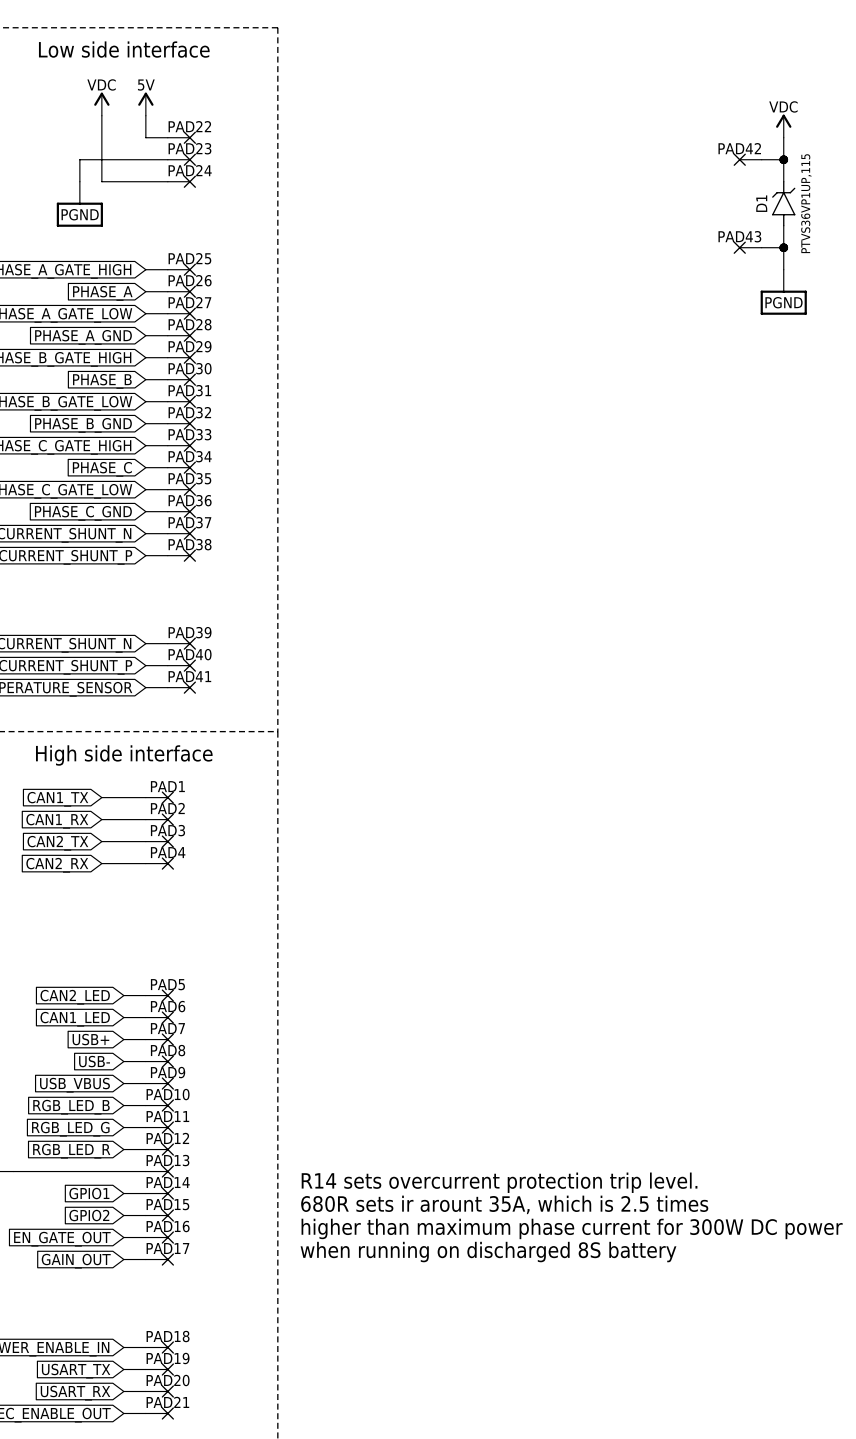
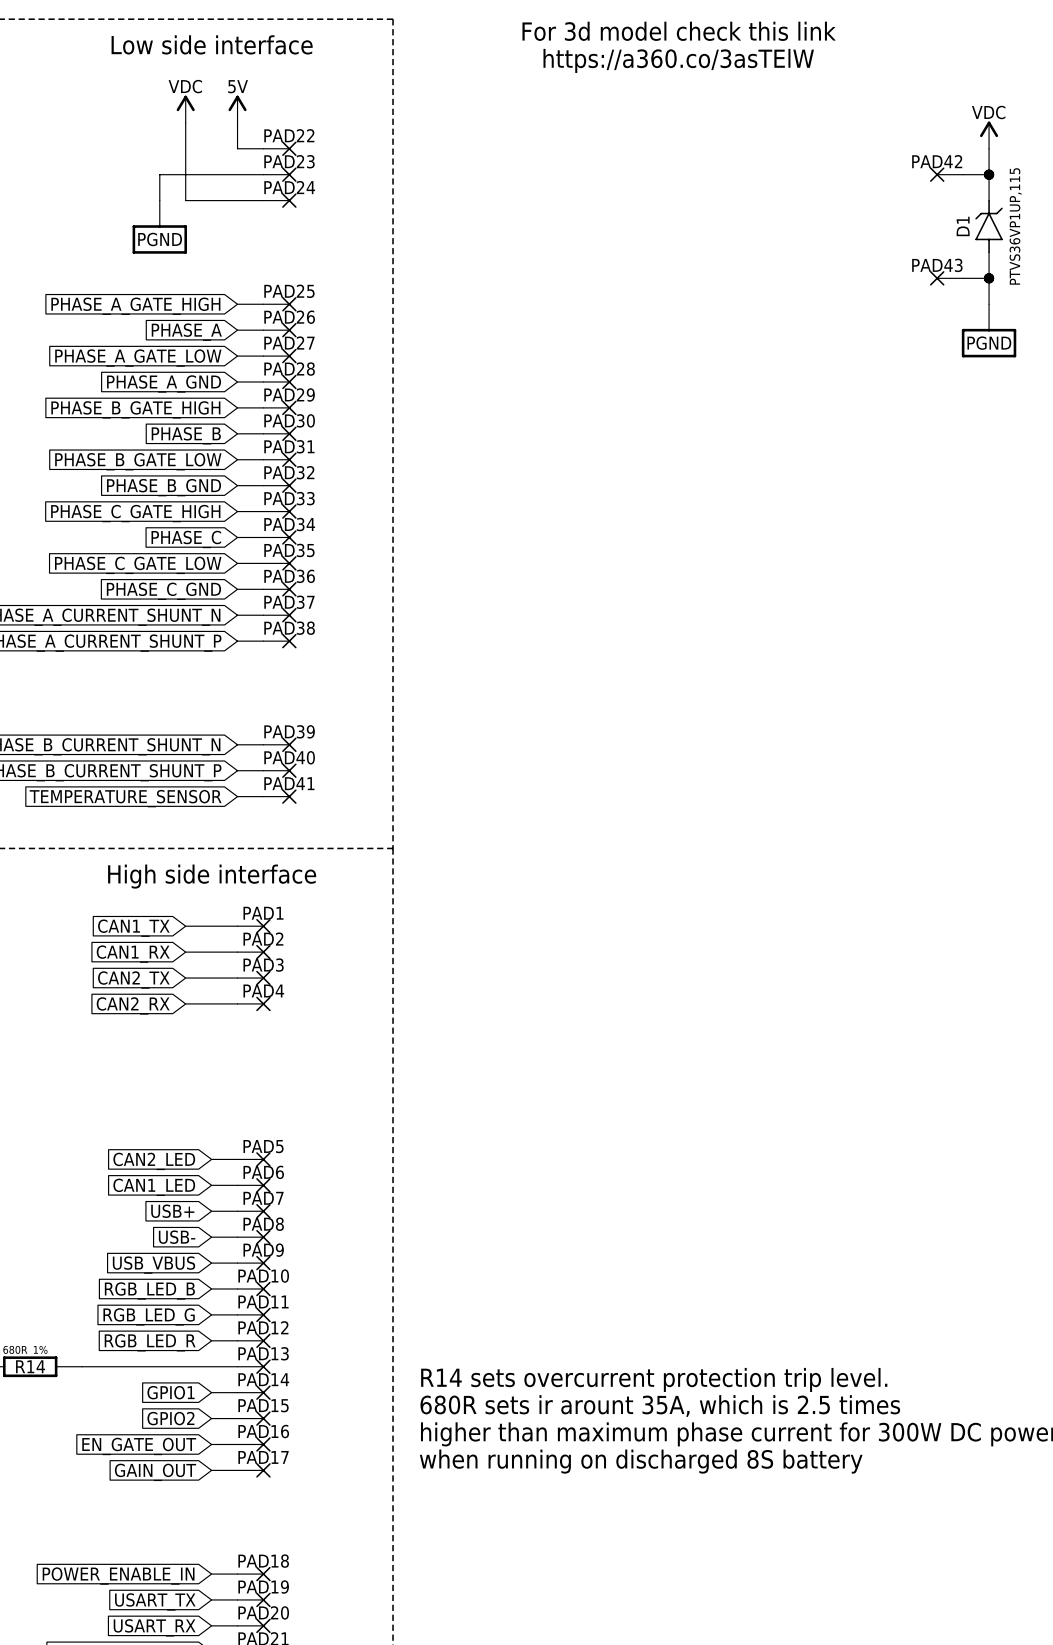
text: none -> For 3d model check this link (679, 31)
text: none -> https://a360.co/3asTElW (678, 60)

